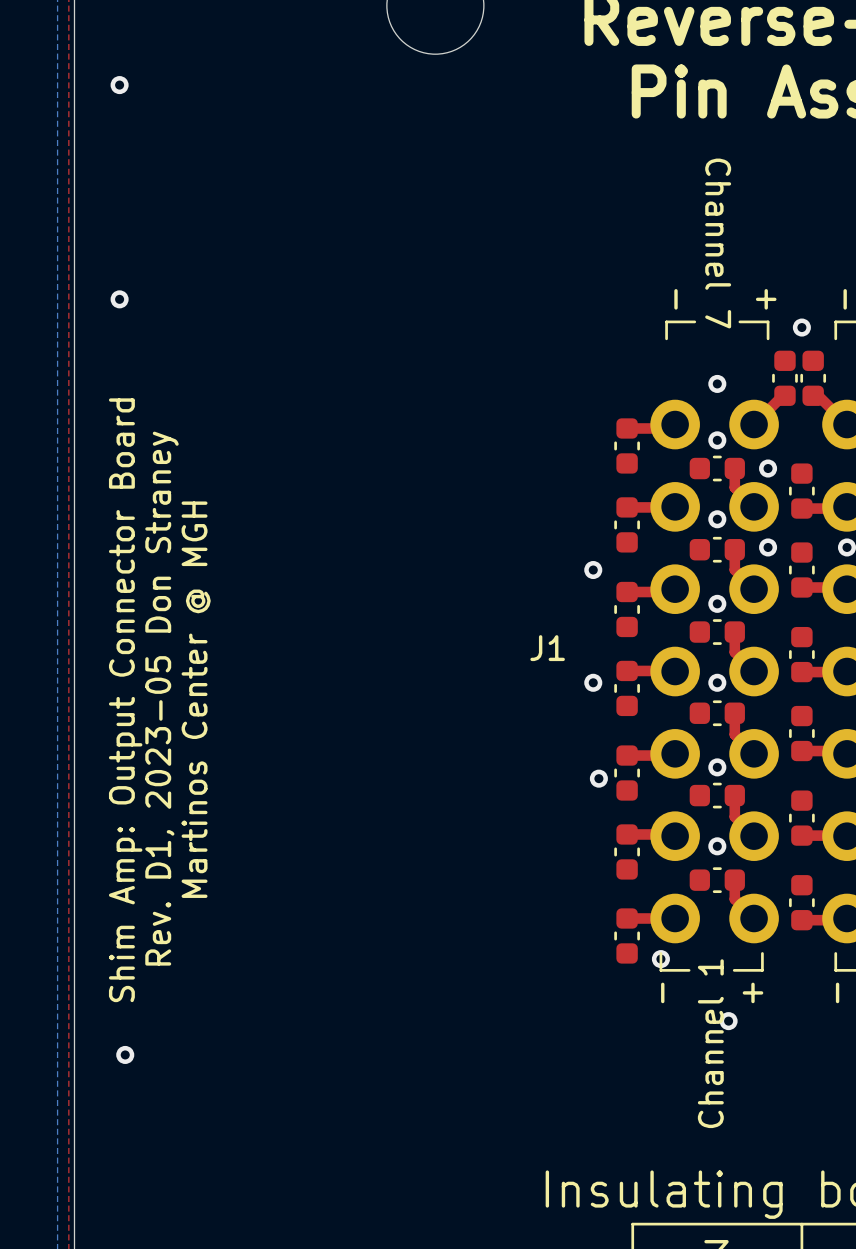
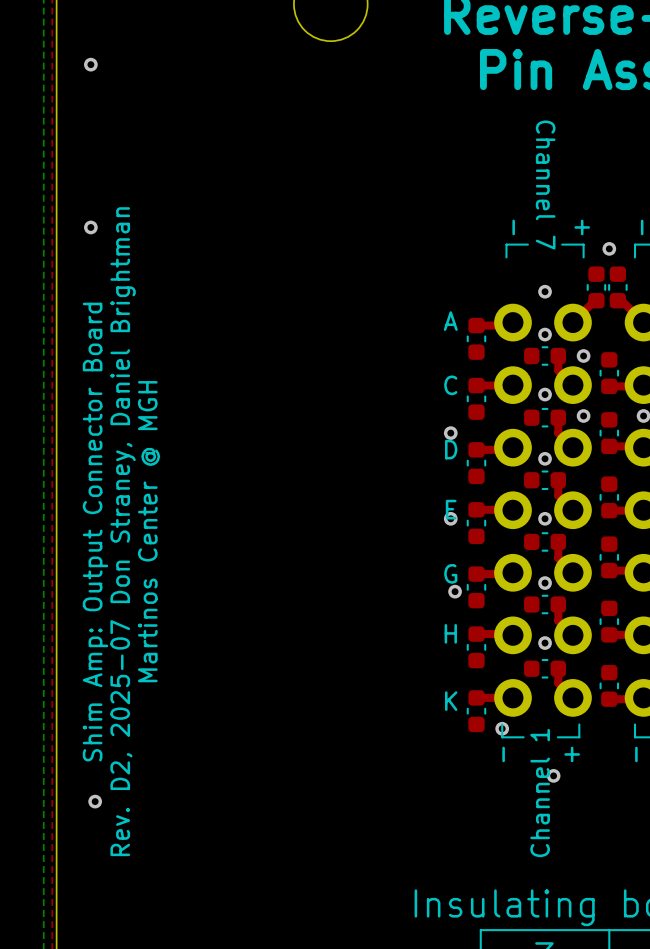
text: none -> A (450, 321)
text: none -> C (450, 385)
text: none -> D (451, 449)
J1 name: J1 (547, 648) -> none
text: none -> E (451, 509)
text: Rev. D1, 2023-05 Don Straney (161, 698) -> Rev. D2, 2025-07 Don Straney, Daniel Brightman (123, 531)
text: none -> G (450, 573)
text: none -> H (450, 633)
text: none -> K (451, 701)

